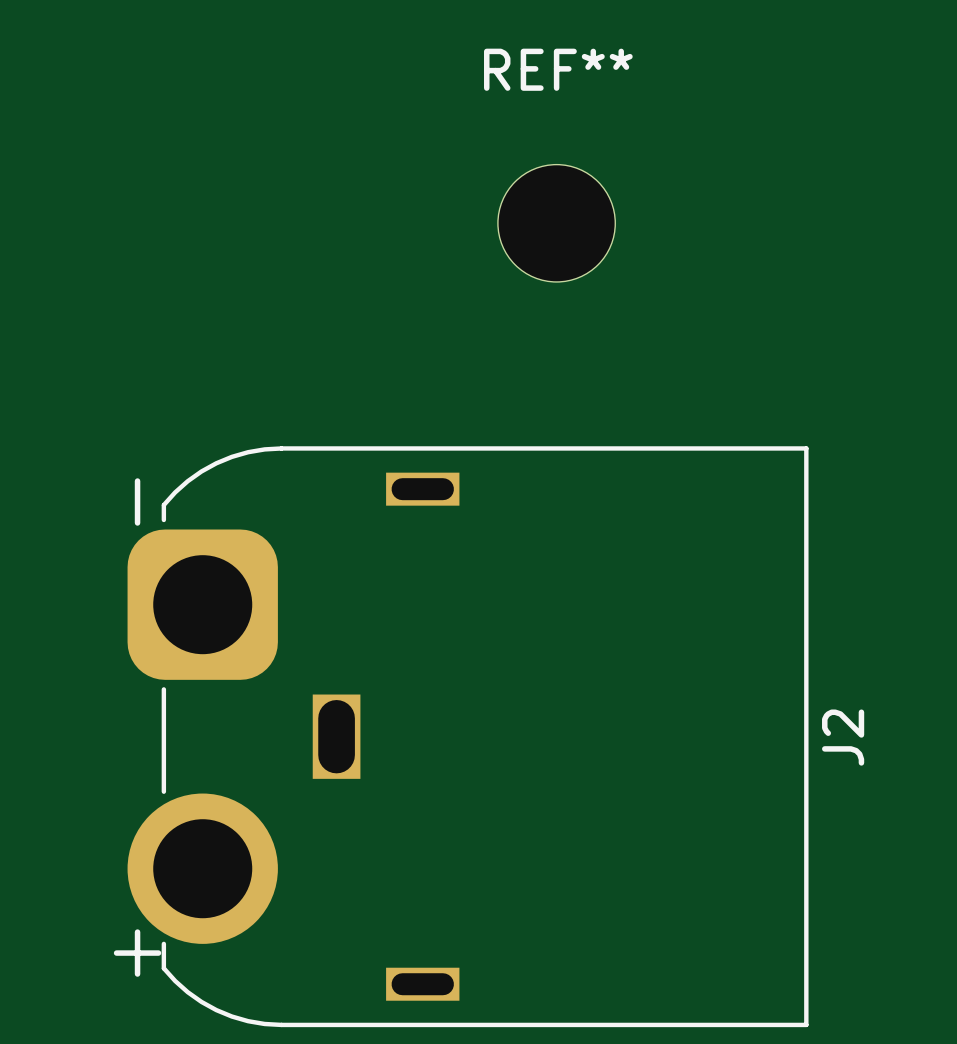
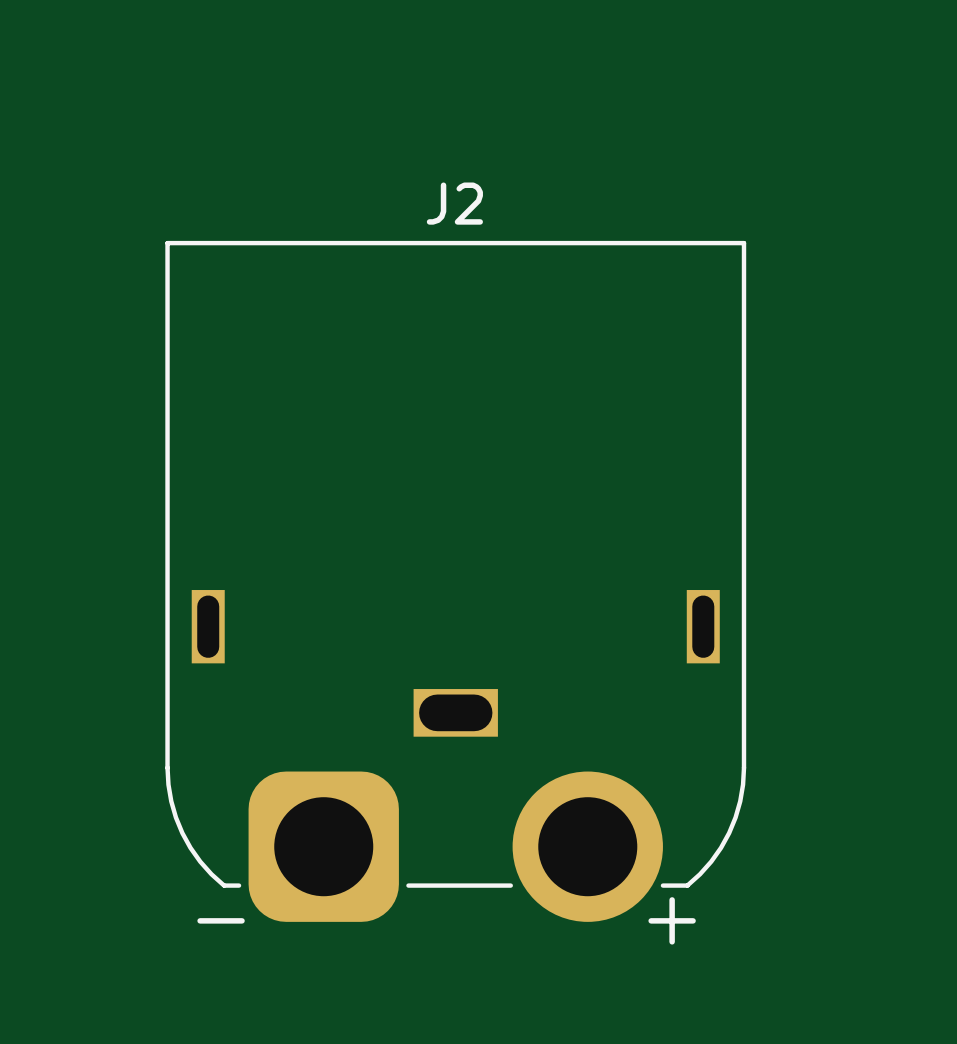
REF**: (556, 223) -> none
J2 rotation: 0° (468, 736) -> 90° counterclockwise (455, 581)

